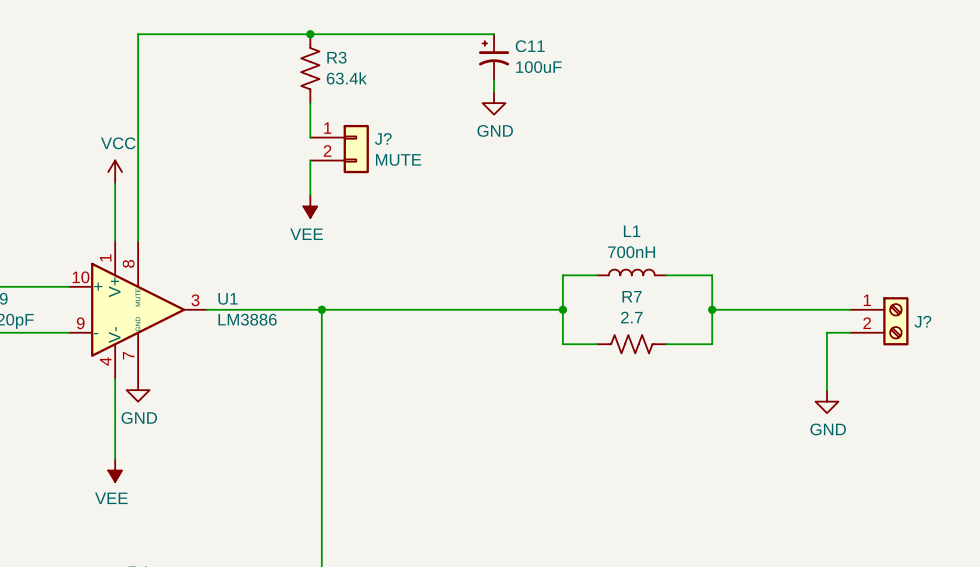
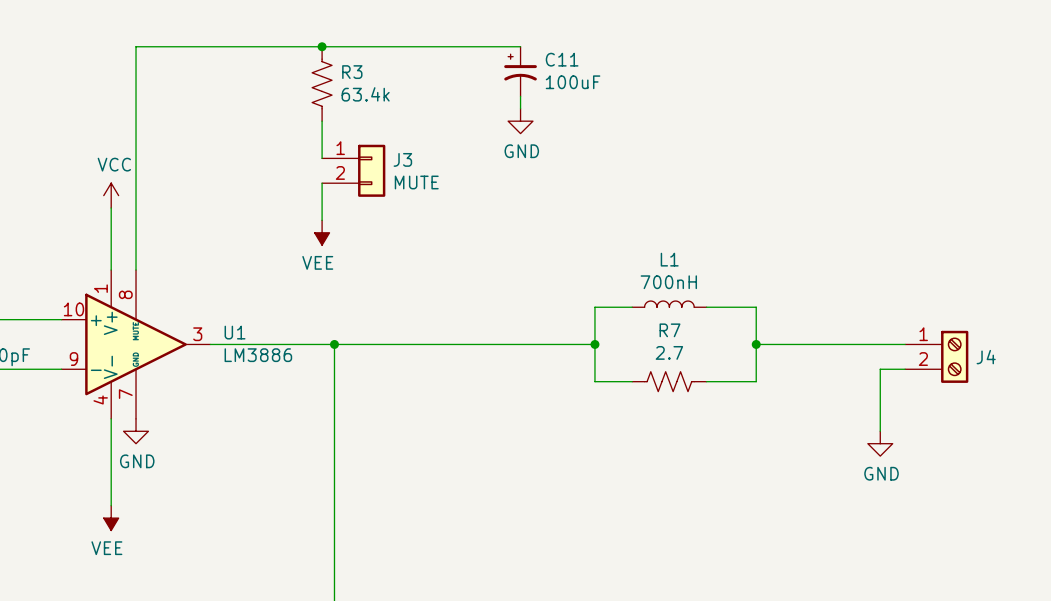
J? name: J? (383, 138) -> J3 (402, 159)
J? name: J? (922, 321) -> J4 (986, 357)

